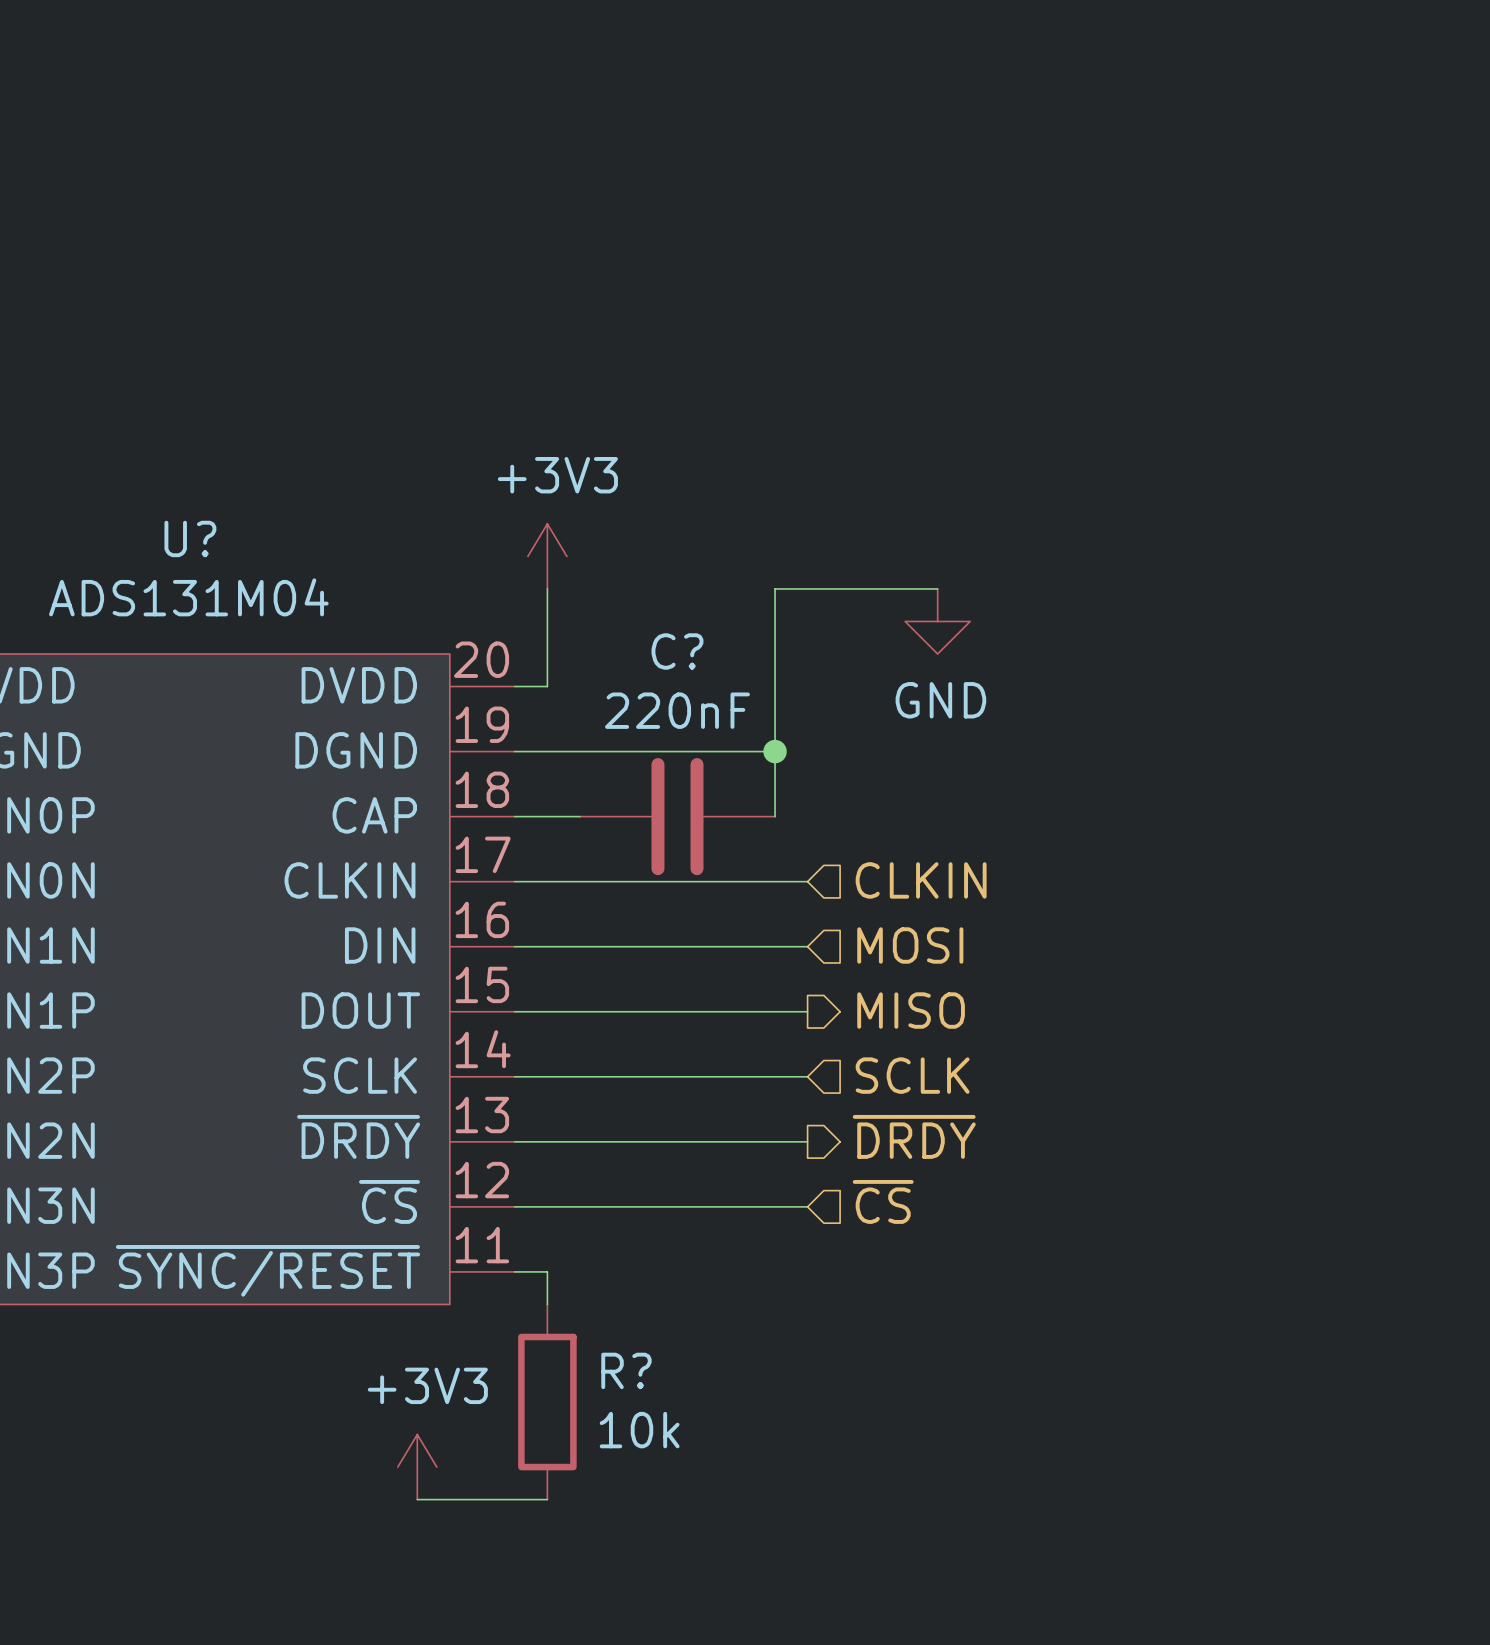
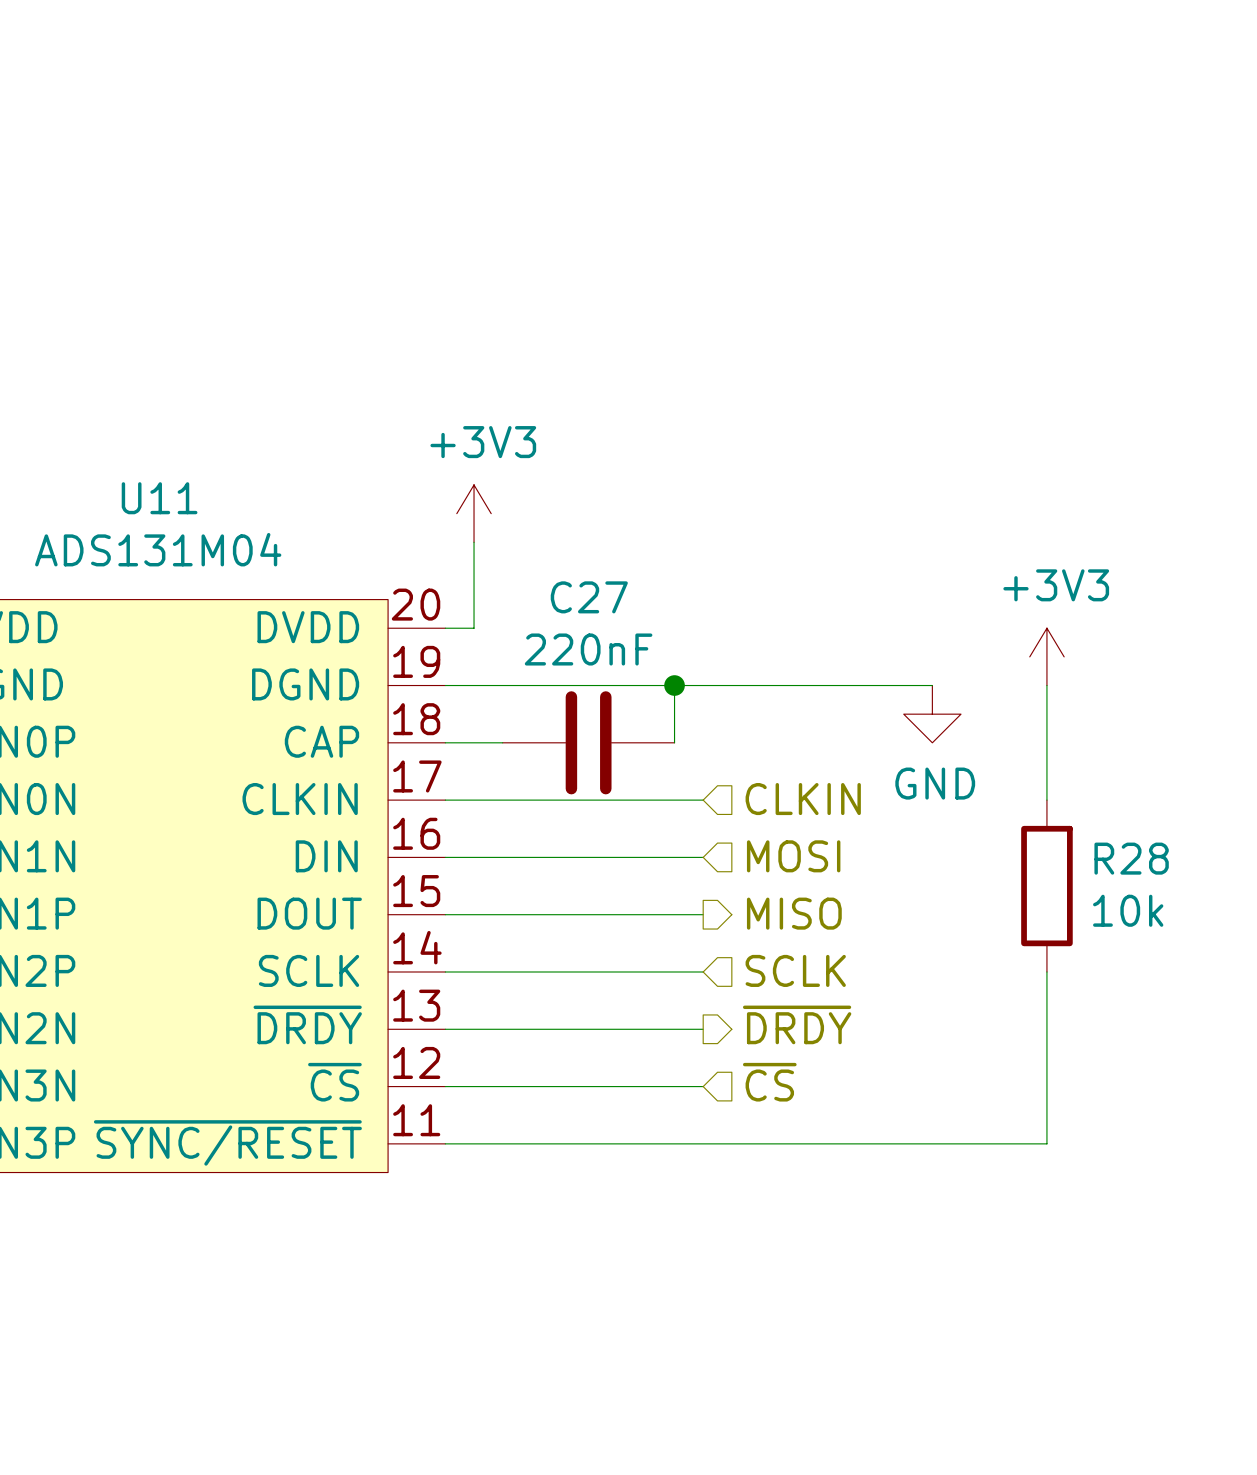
U? name: U? (190, 538) -> U11 (159, 498)
wire: (937, 588) (775, 588) (775, 751) -> (932, 685) (674, 685)
power symbol position: GND (937, 621) -> GND (932, 714)
C? name: C? (677, 651) -> C27 (589, 597)
power symbol: none -> +3V3 (1046, 656)
wire: none -> (1046, 685) (1046, 800)
R28: none -> 10k (1046, 886)
wire: (547, 1271) (547, 1304) -> (474, 1143) (1046, 1143) (1046, 971)
R?: 10k (547, 1402) -> none
power symbol: +3V3 (417, 1467) -> none
wire: (417, 1499) (547, 1499) -> none

